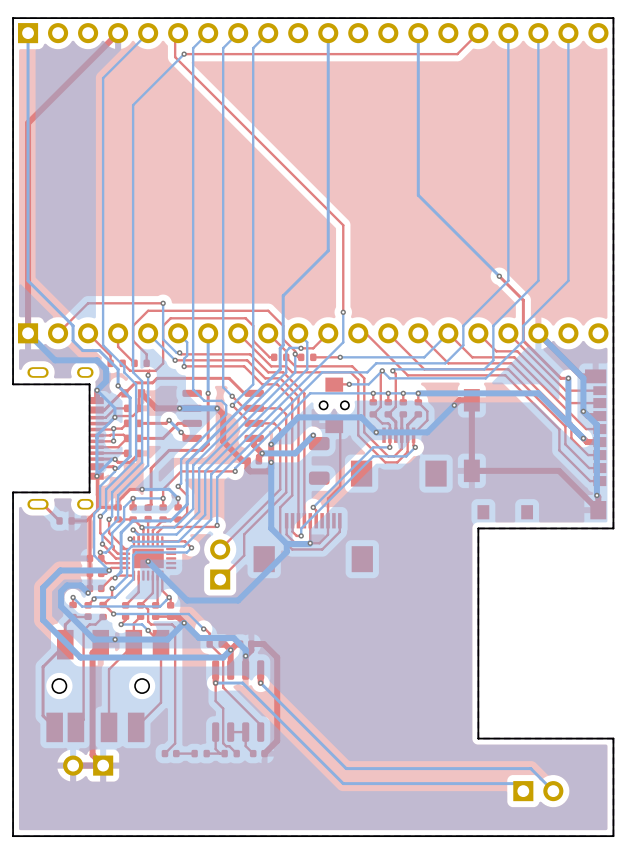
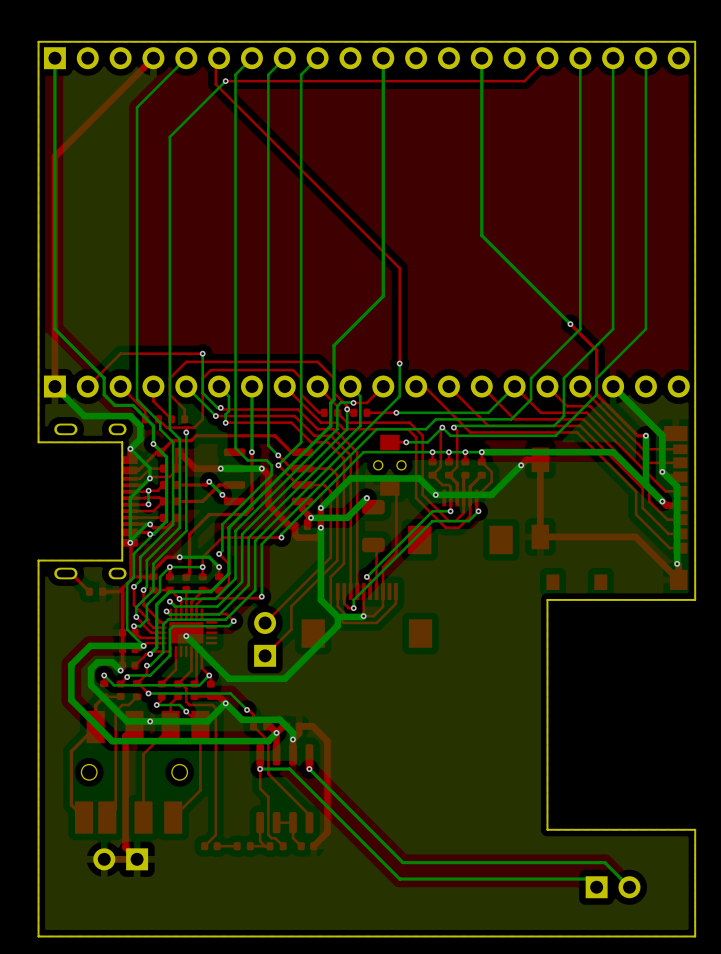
top track: none -> (373, 544) (376, 548) (376, 591)

